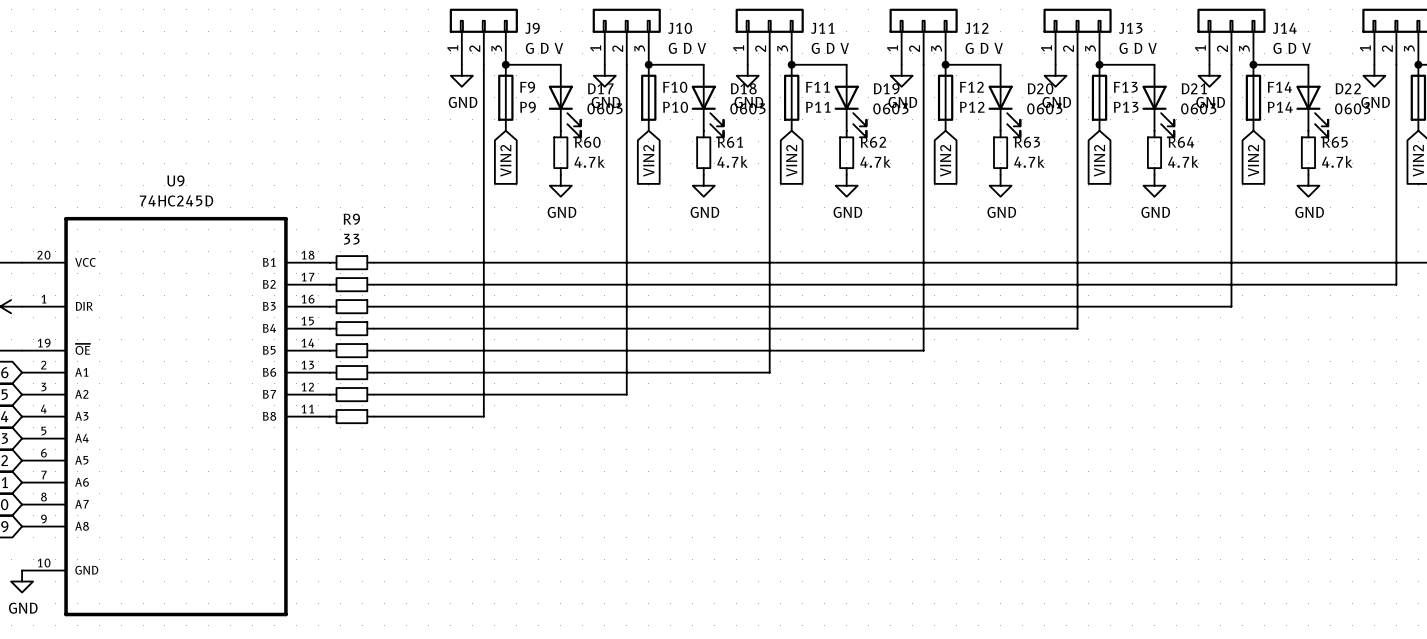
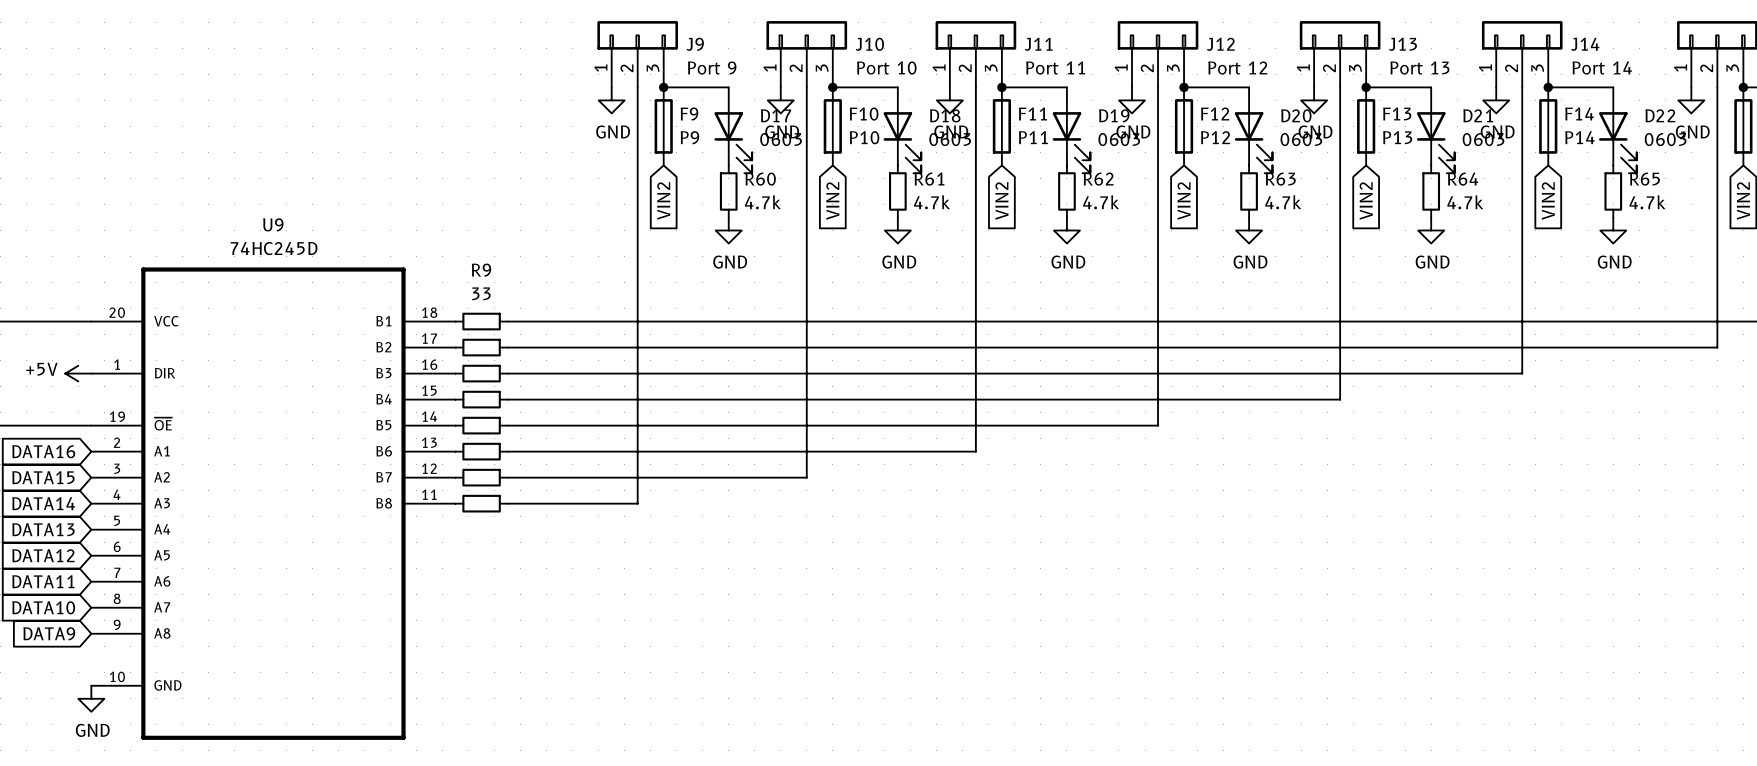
J9 value: G D V (544, 48) -> Port 9 (712, 68)
J10 value: G D V (687, 48) -> Port 10 (886, 67)
J11 value: G D V (830, 48) -> Port 11 (1055, 67)
J12 value: G D V (984, 48) -> Port 12 (1237, 67)
J13 value: G D V (1138, 48) -> Port 13 (1419, 67)
J14 value: G D V (1292, 48) -> Port 14 (1602, 67)

